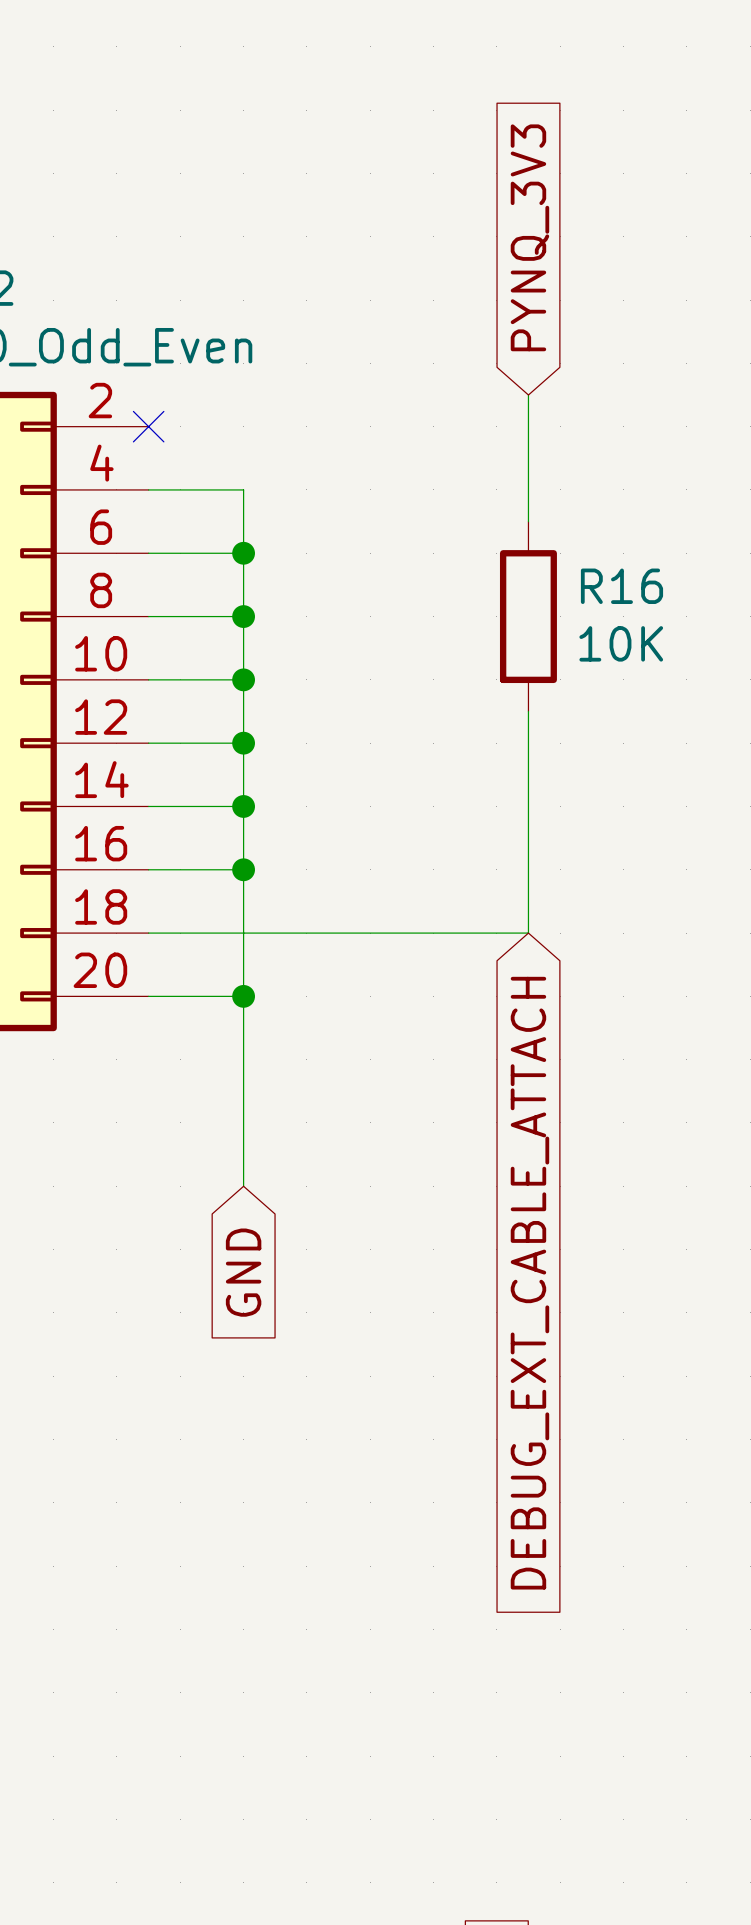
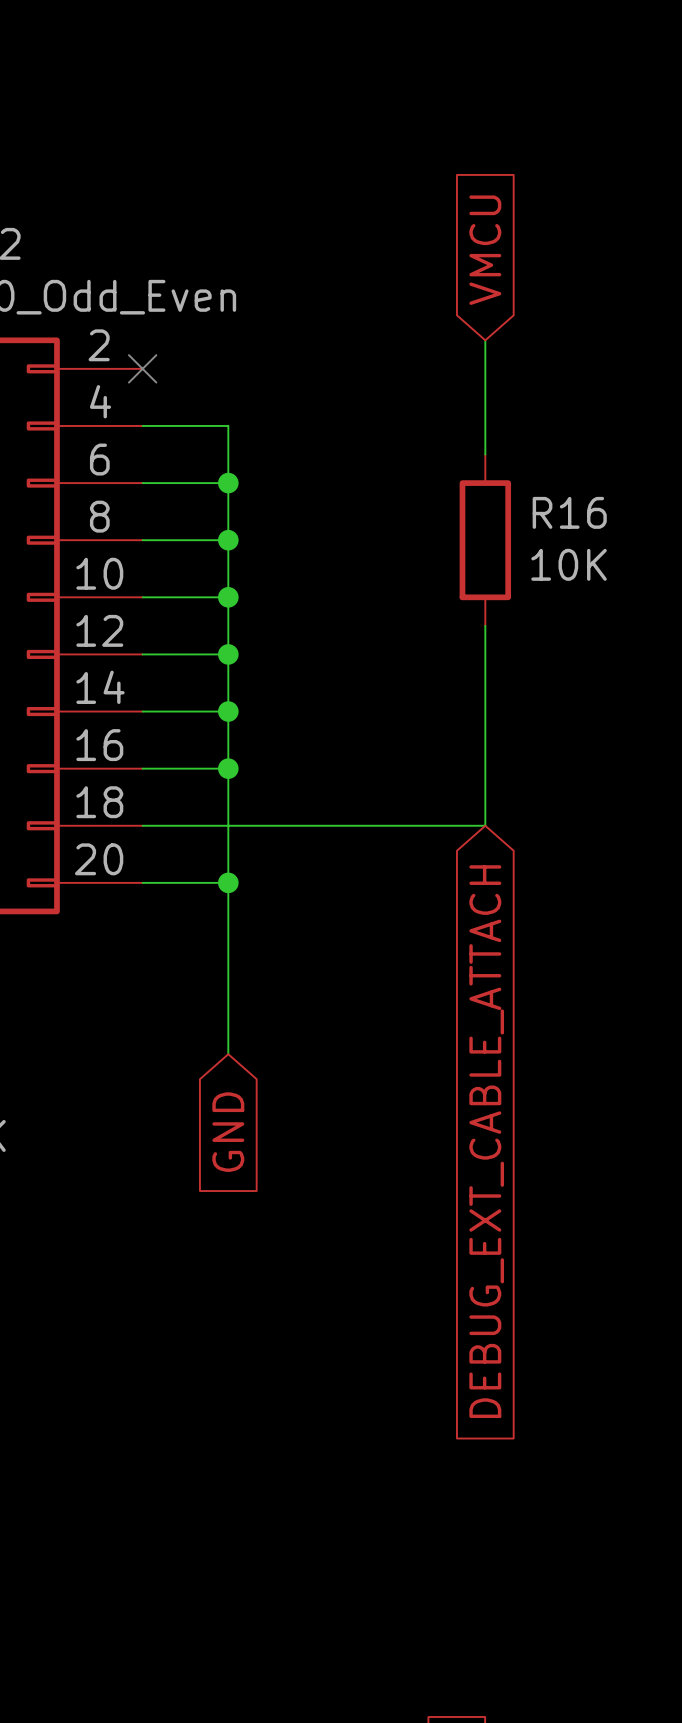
global label: PYNQ_3V3 (529, 237) -> VMCU (485, 250)

